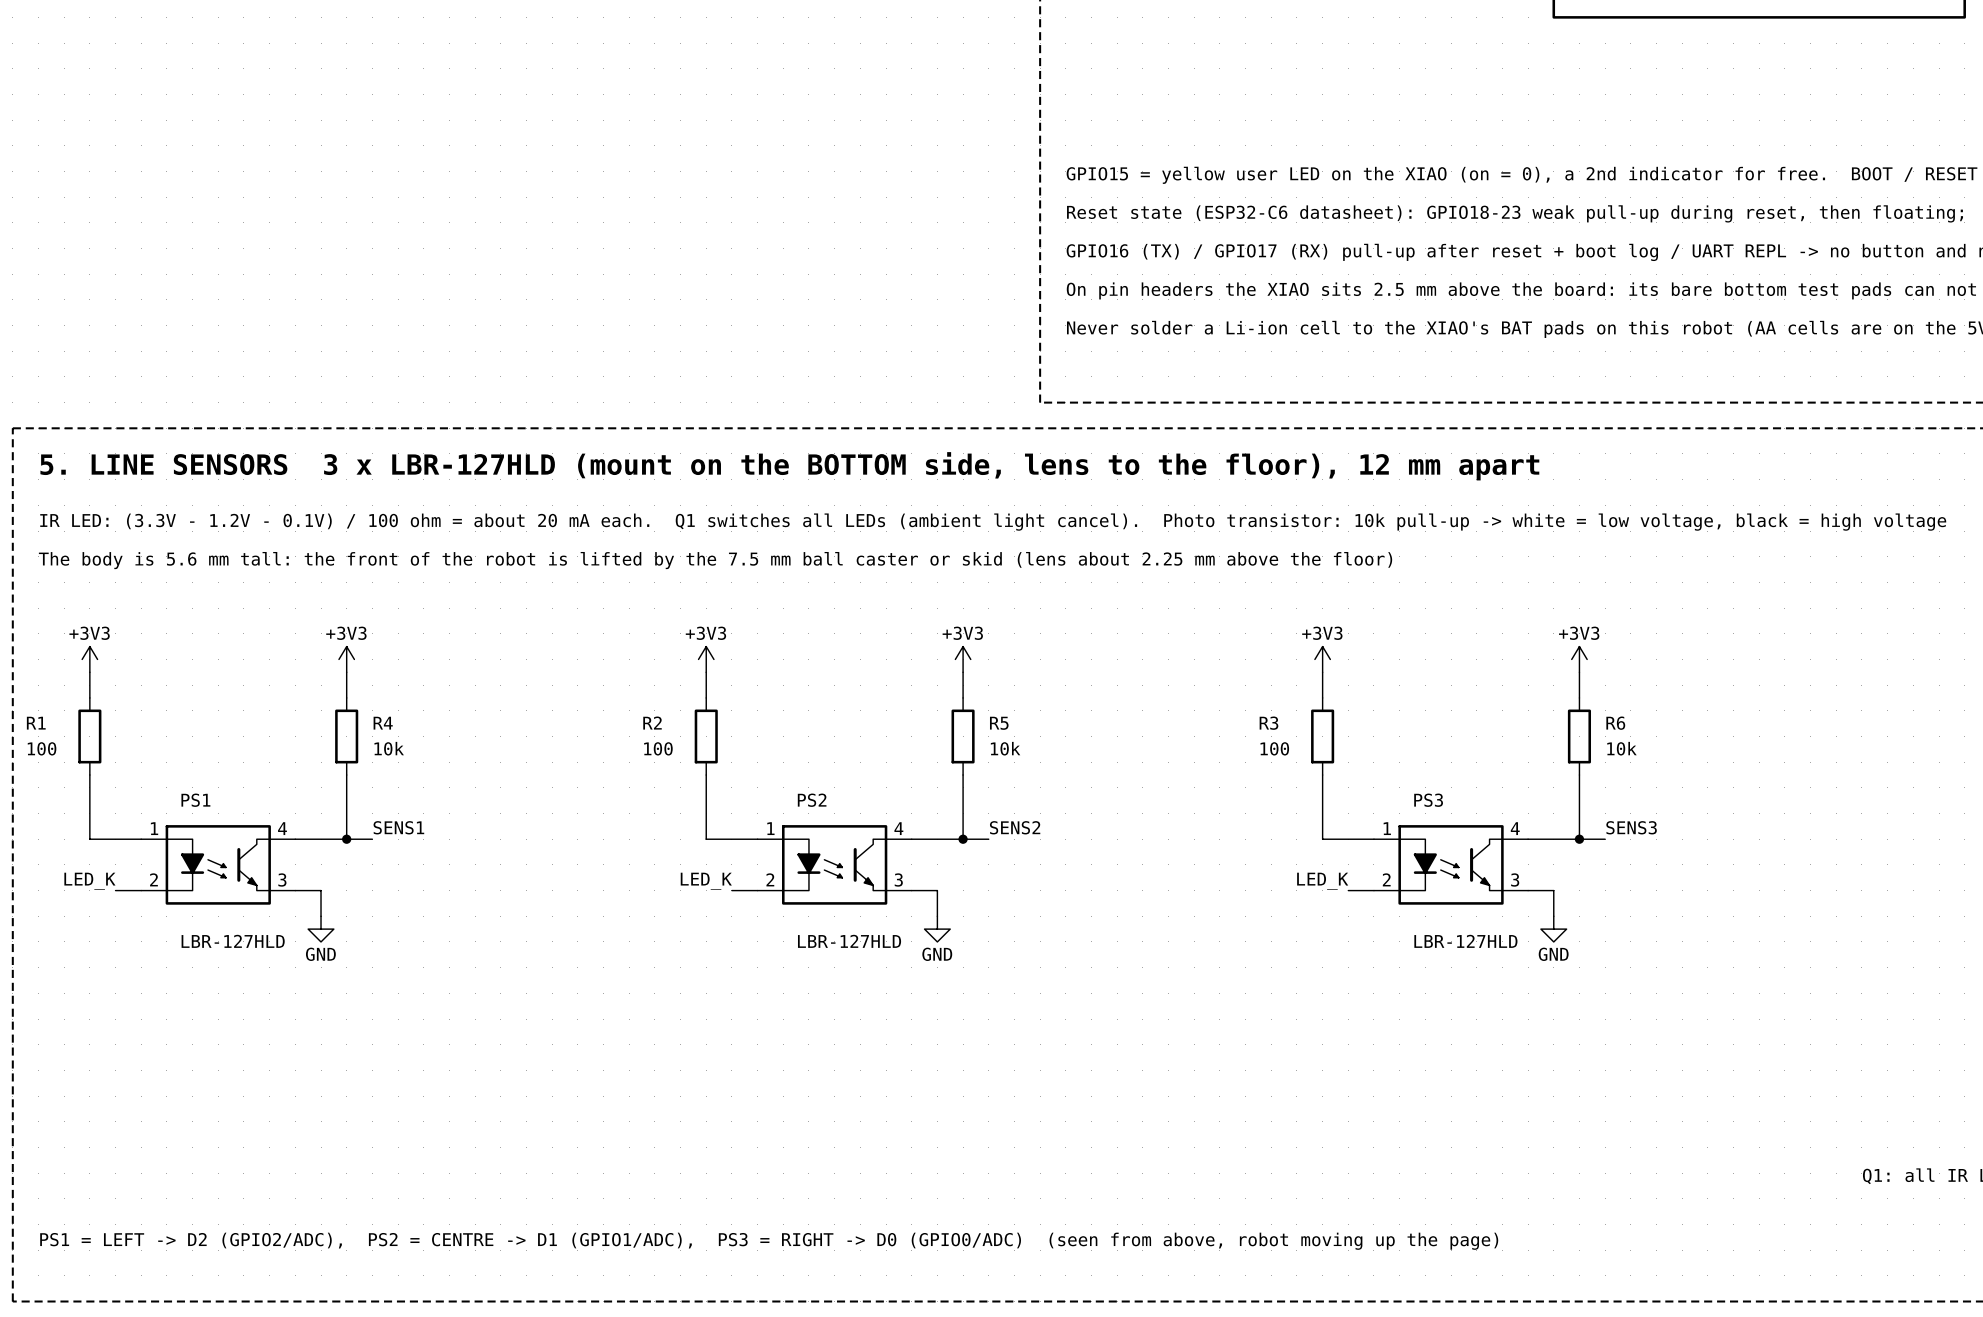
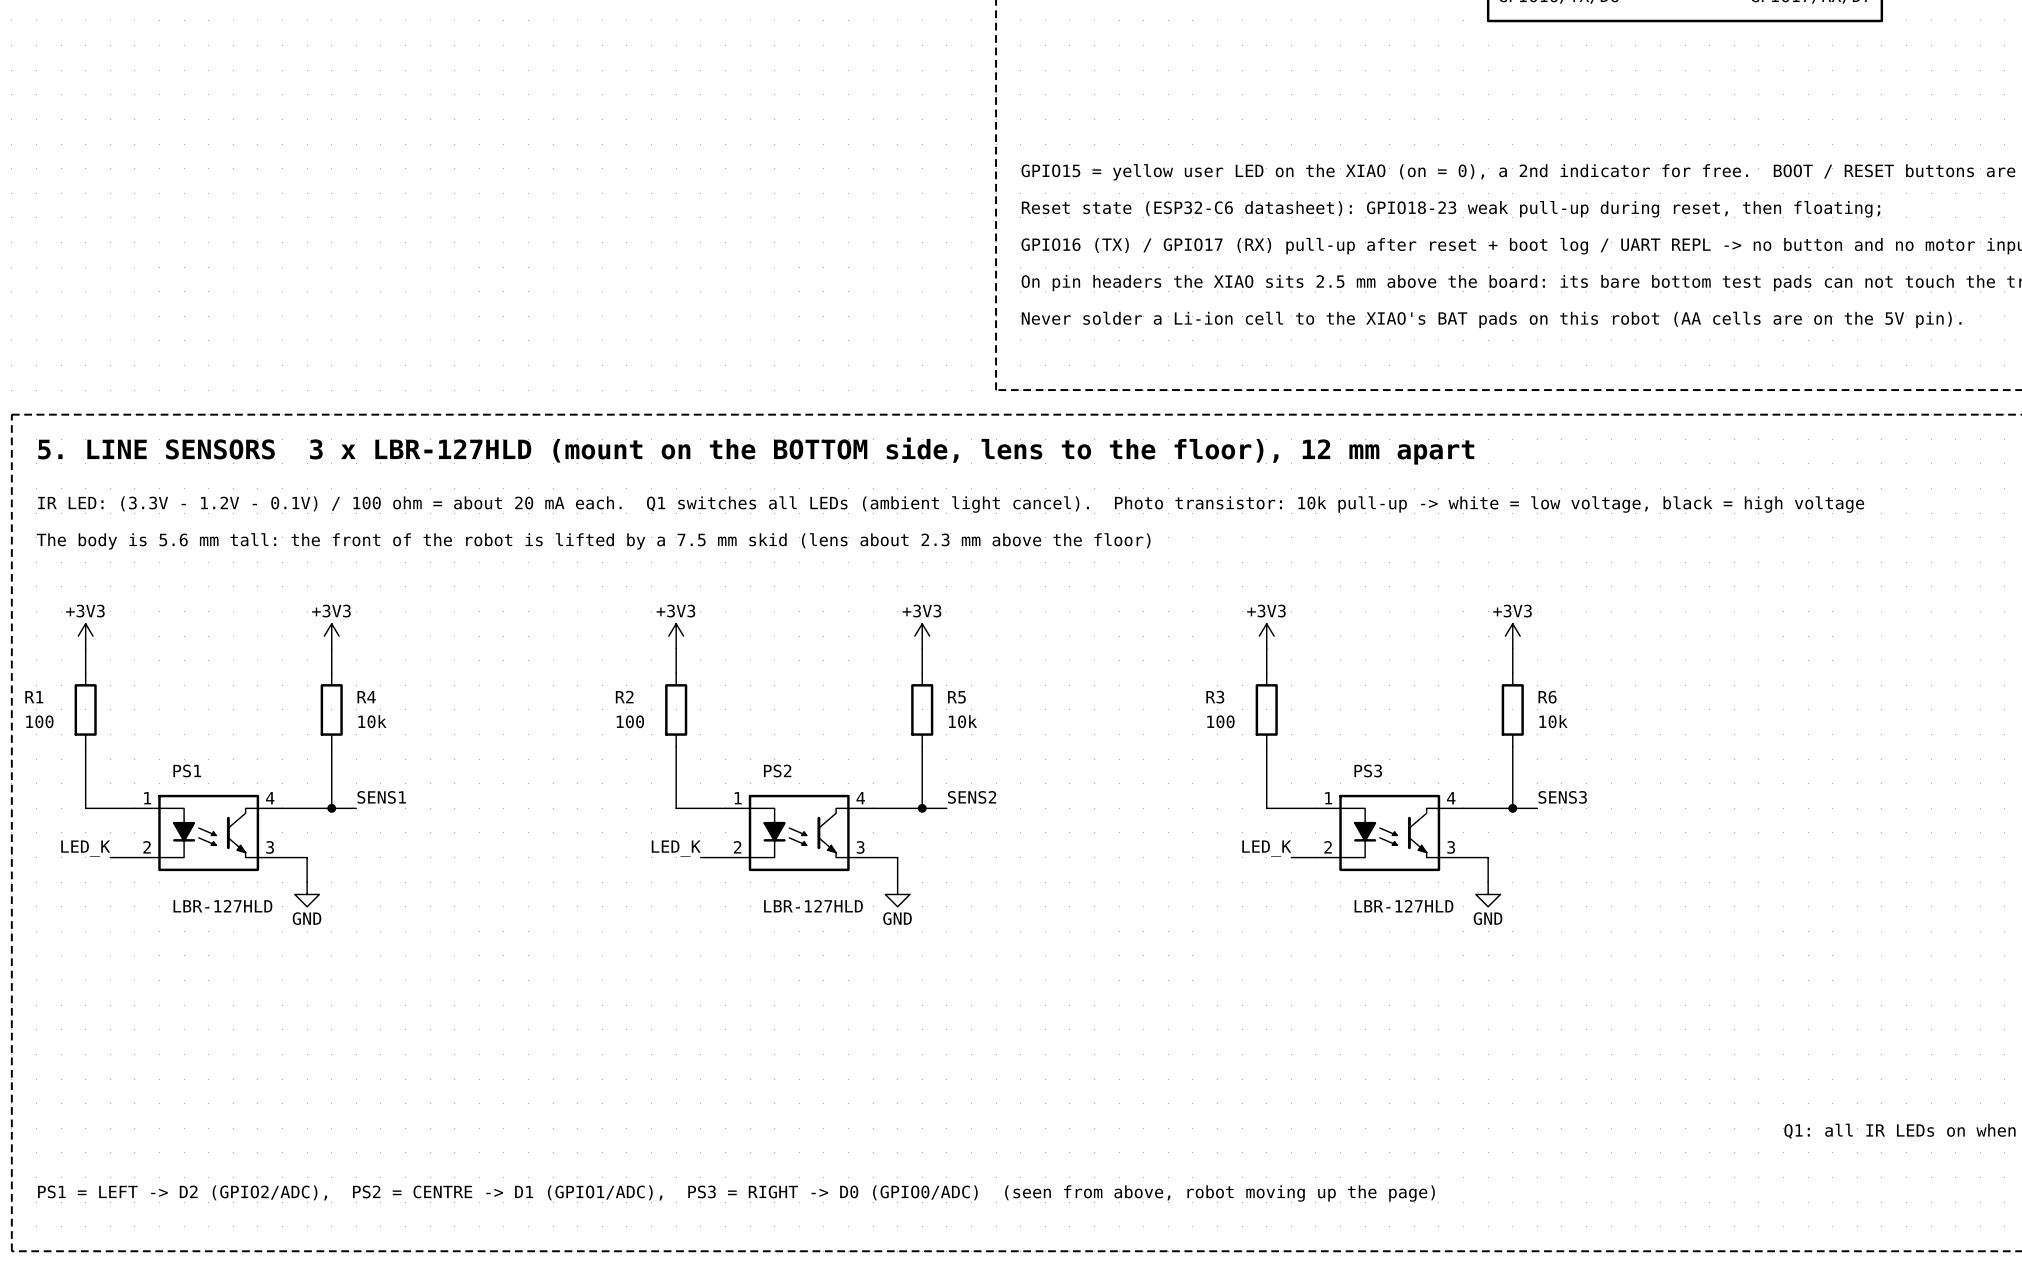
text: The body is 5.6 mm tall: the front of the robot is lifted by the 7.5 mm ball caster or skid (lens about 2.25 mm above the floor) (715, 560) -> The body is 5.6 mm tall: the front of the robot is lifted by a 7.5 mm skid (lens about 2.3 mm above the floor) (593, 541)

